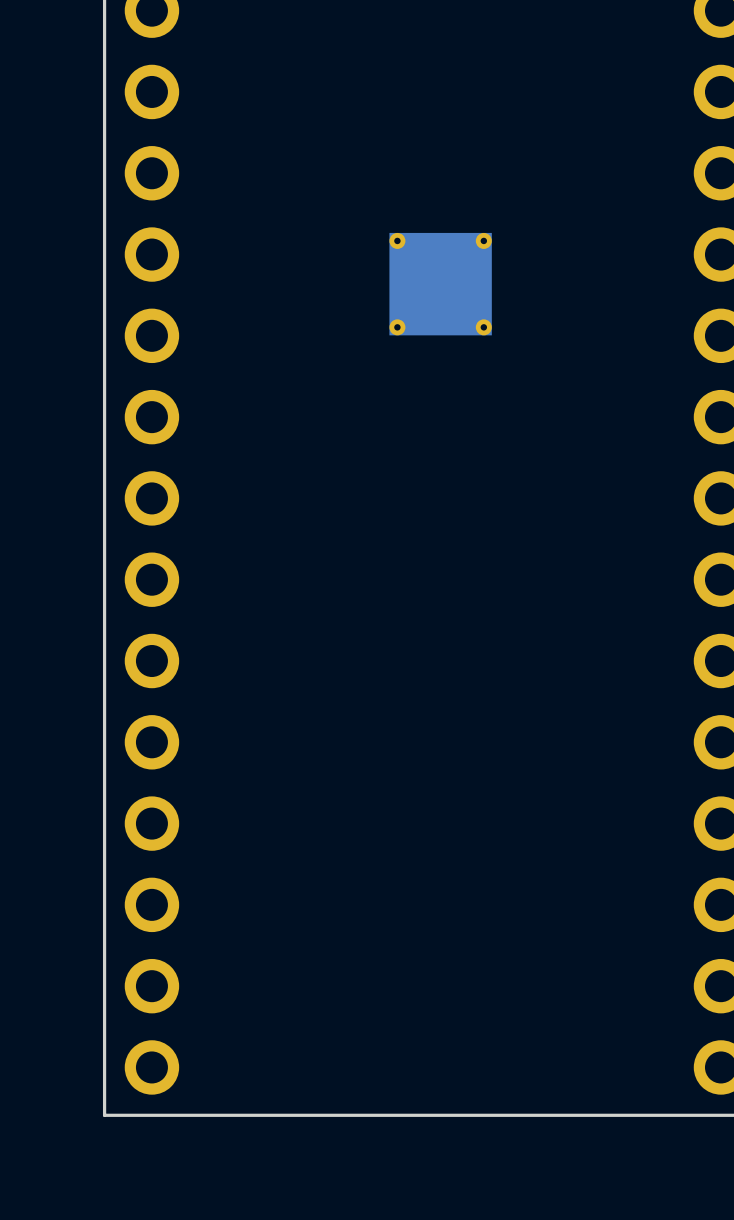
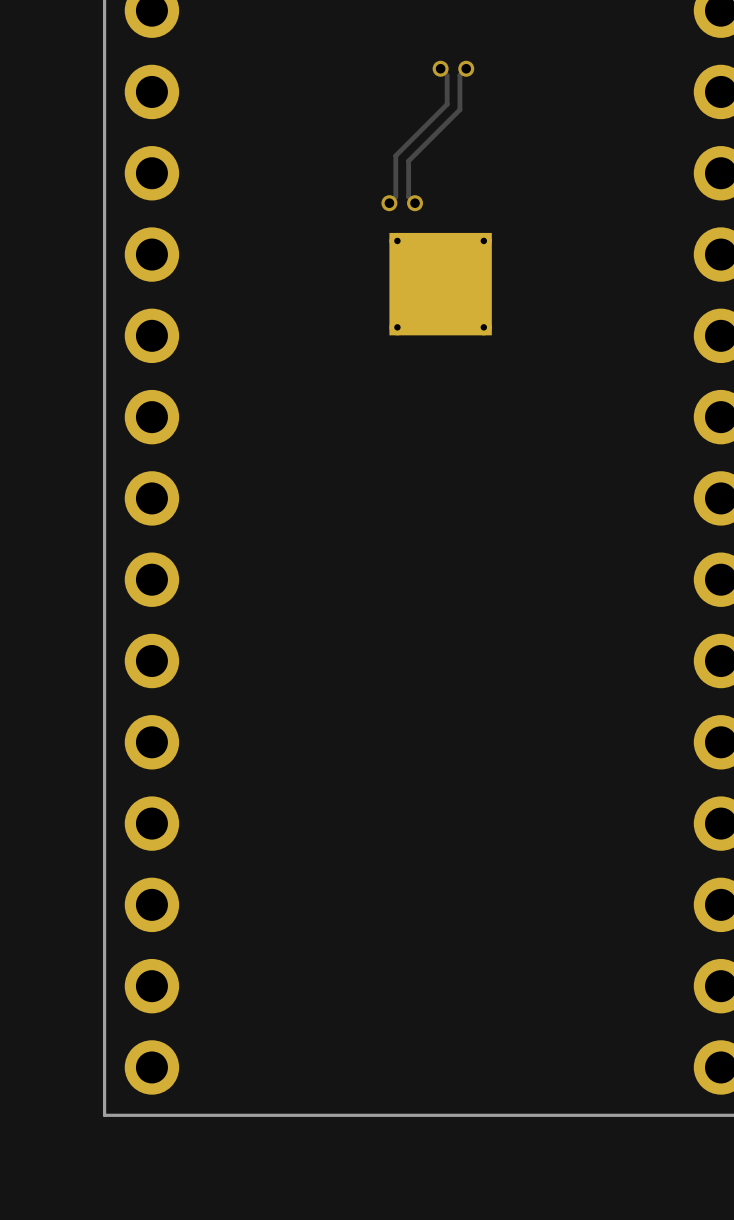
via: none -> (440, 68)
via: none -> (466, 68)
track: none -> (447, 76) (447, 104) (395, 155) (395, 196) (389, 203)
track: none -> (459, 76) (459, 109) (408, 161) (408, 196) (415, 203)
via: none -> (389, 203)
via: none -> (415, 203)

